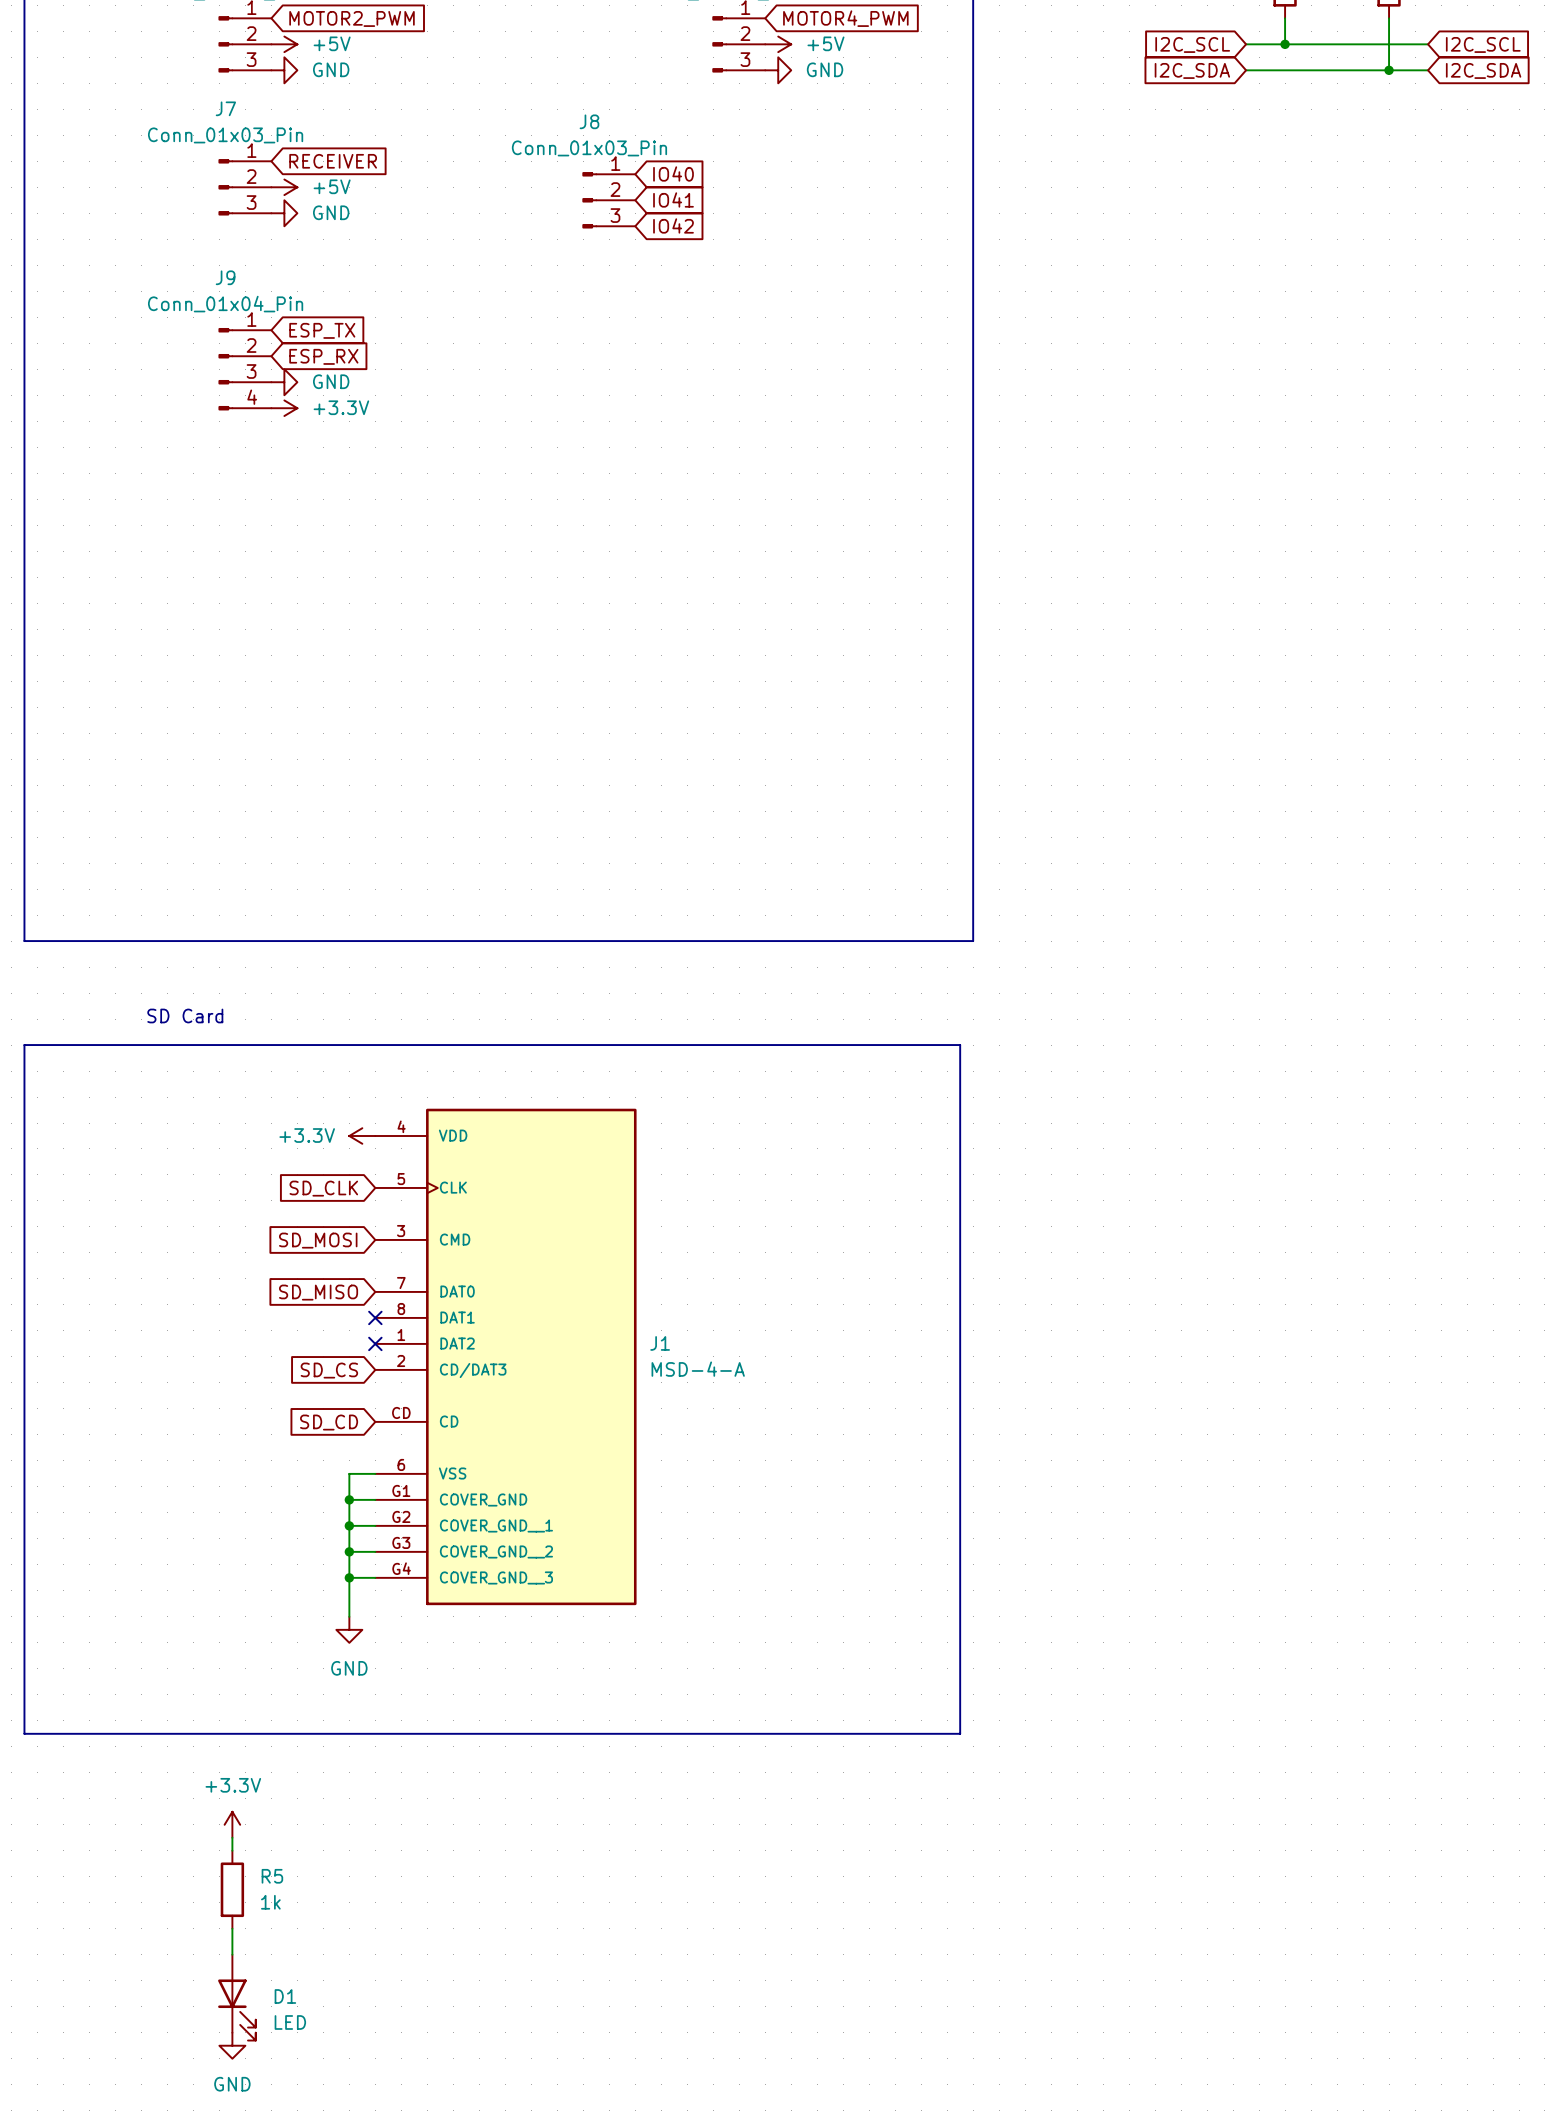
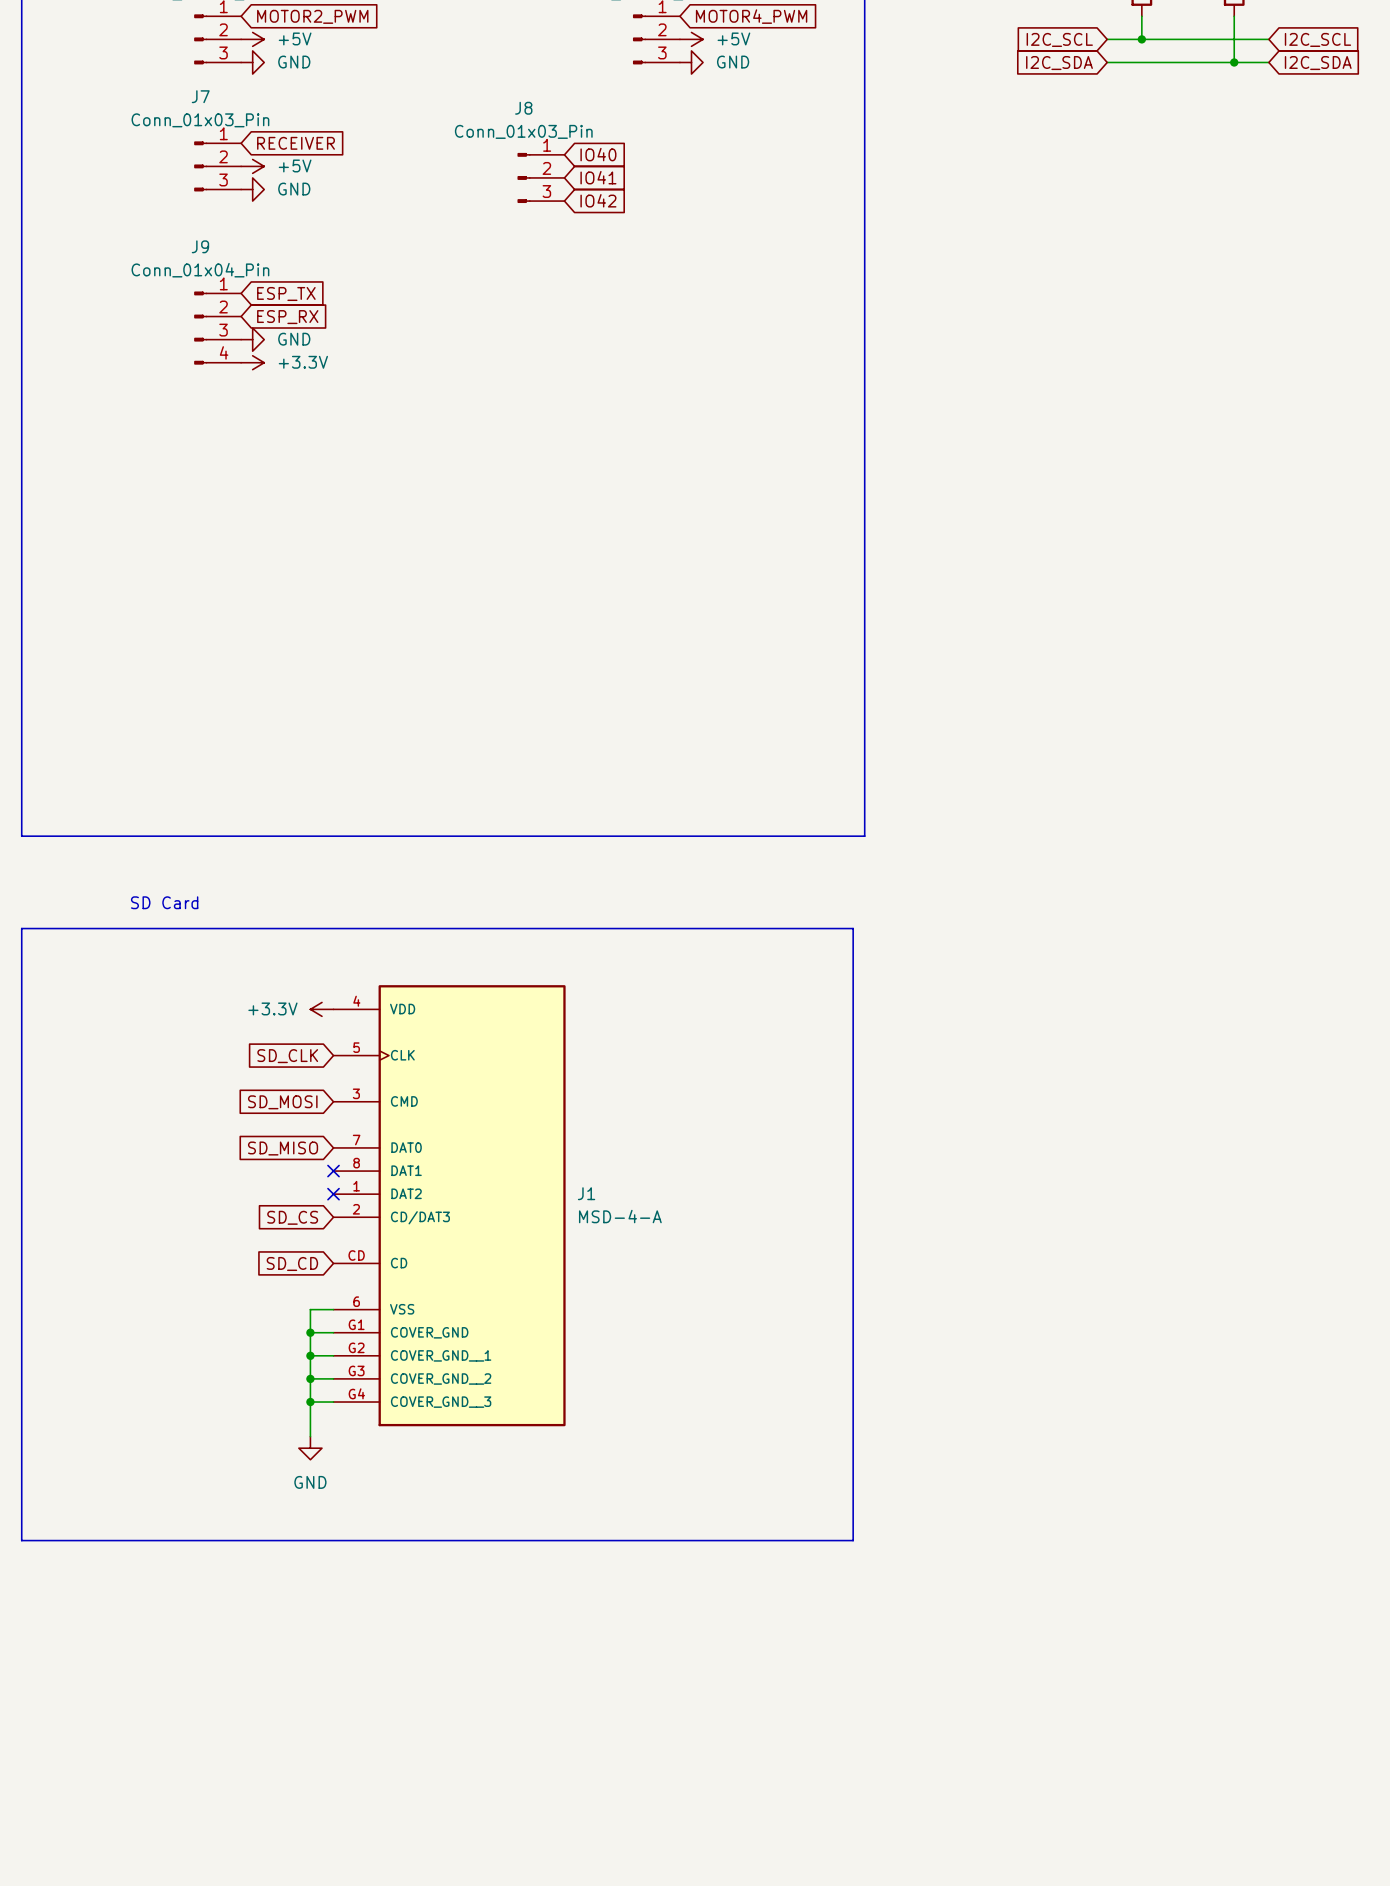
power symbol: +3.3V (232, 1824) -> none
wire: (232, 1837) (232, 1850) -> none
R5: 1k (232, 1889) -> none
wire: (232, 1928) (232, 1954) -> none
D1: LED (236, 1997) -> none
power symbol: GND (232, 2045) -> none

